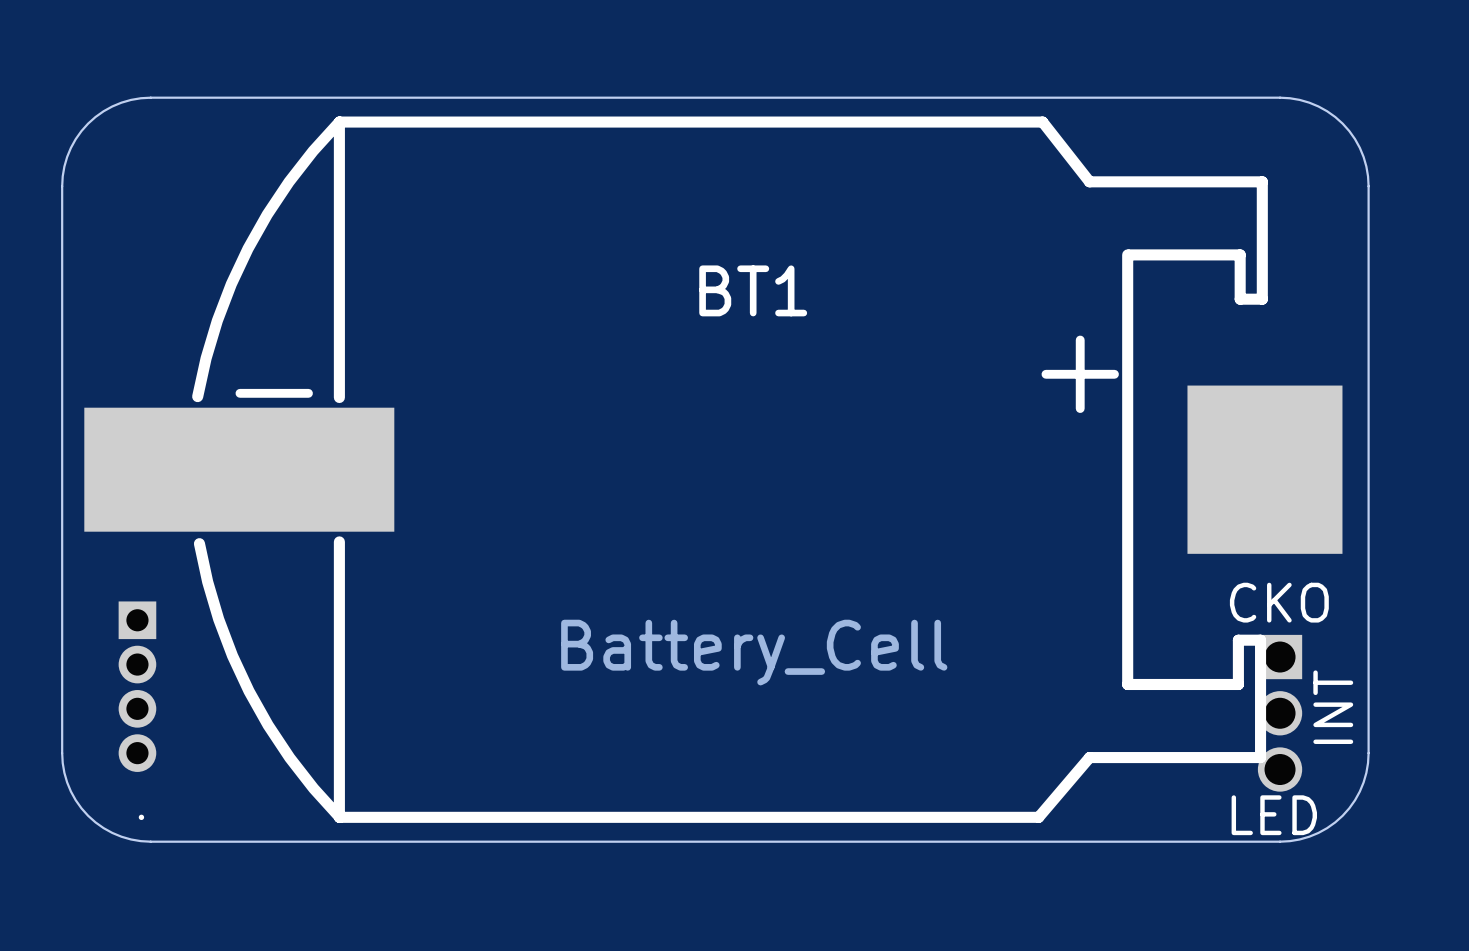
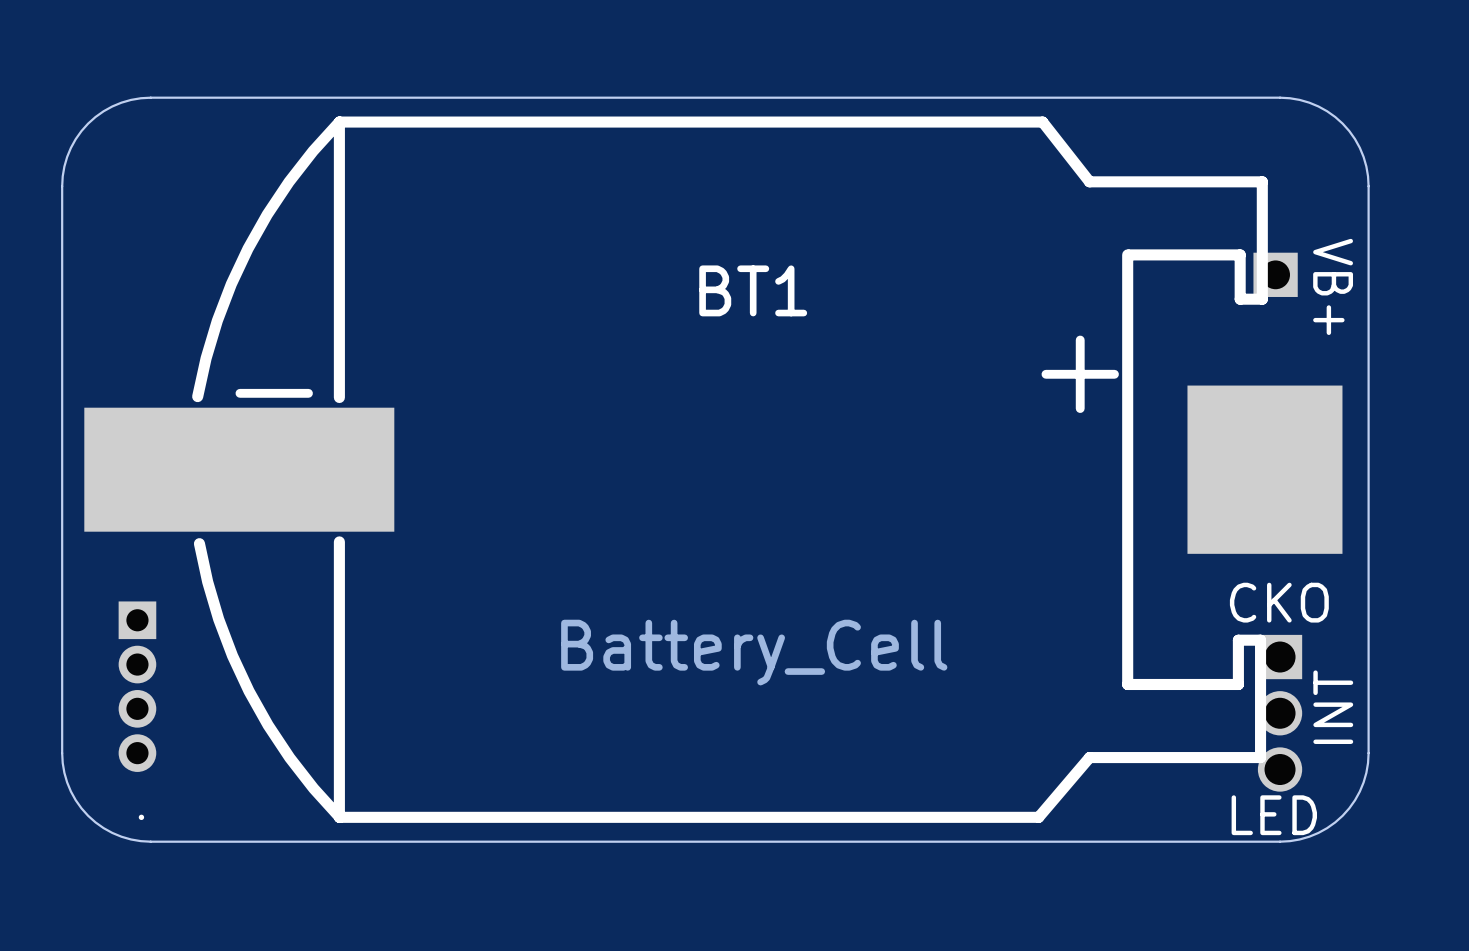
part: none -> (1275, 274)
text: none -> VB+ (1333, 286)

